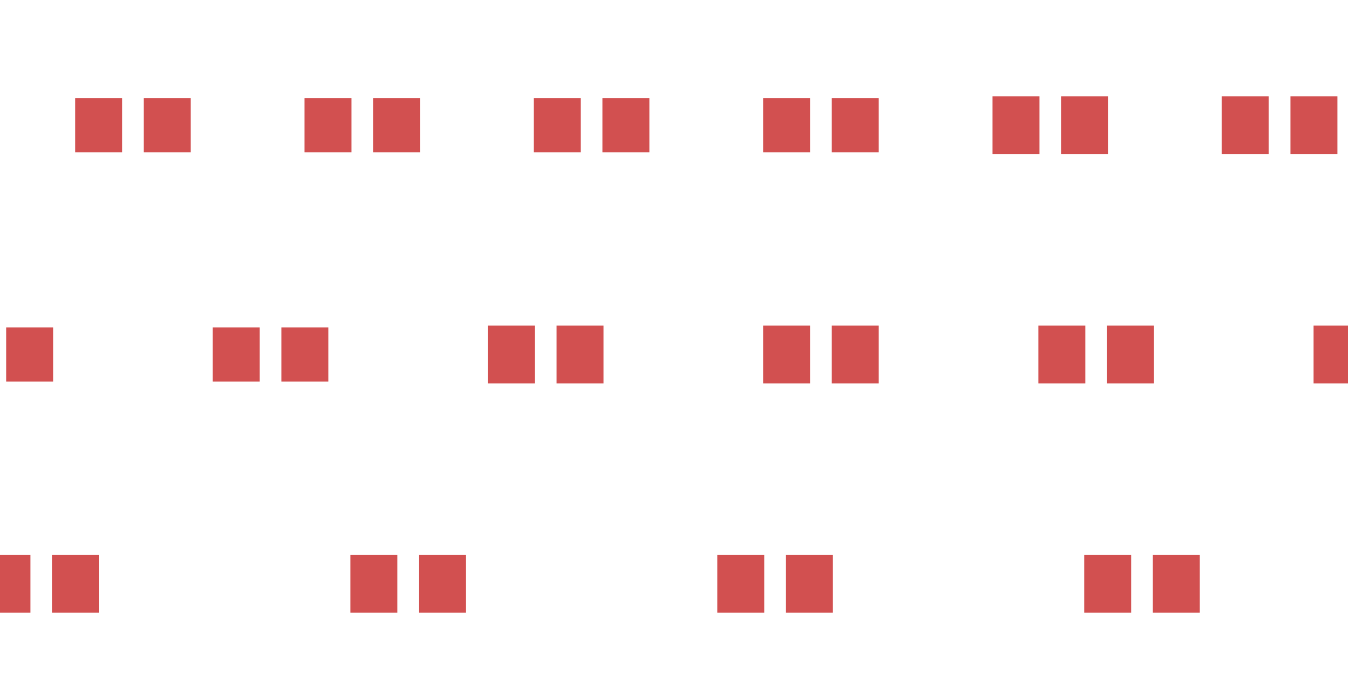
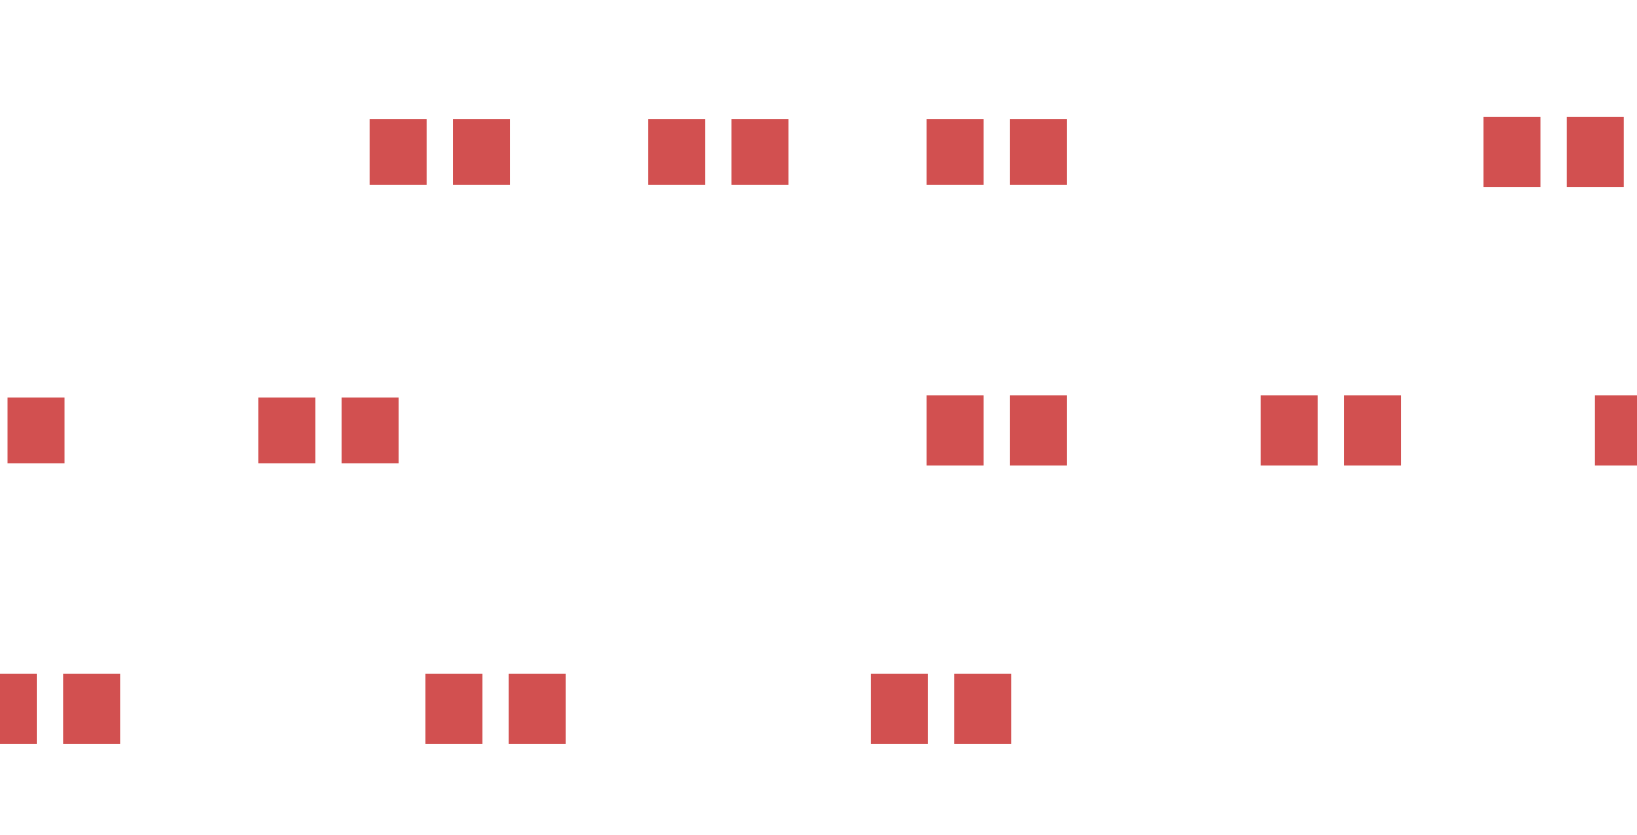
part: (132, 125) -> none
part: (1050, 125) -> none
part: (545, 354) -> none
part: (1141, 583) -> none

